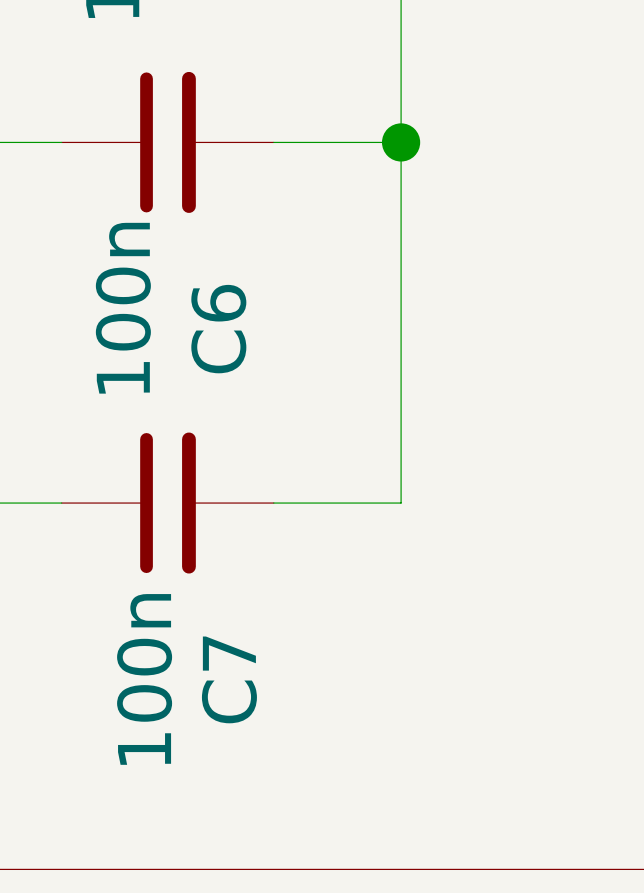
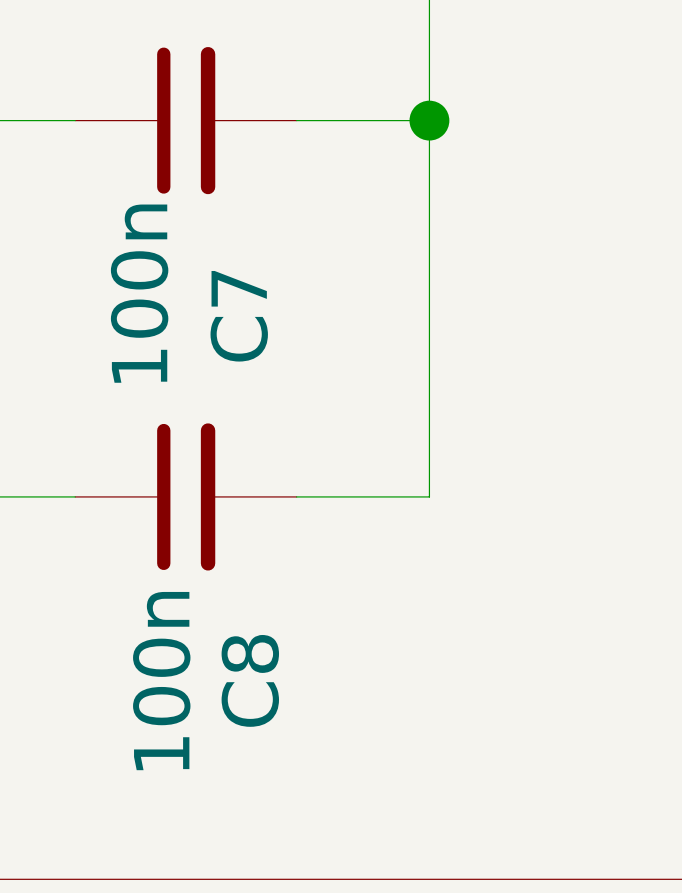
C6 name: C6 (218, 329) -> C7 (239, 316)
C7 name: C7 (229, 679) -> C8 (250, 680)

